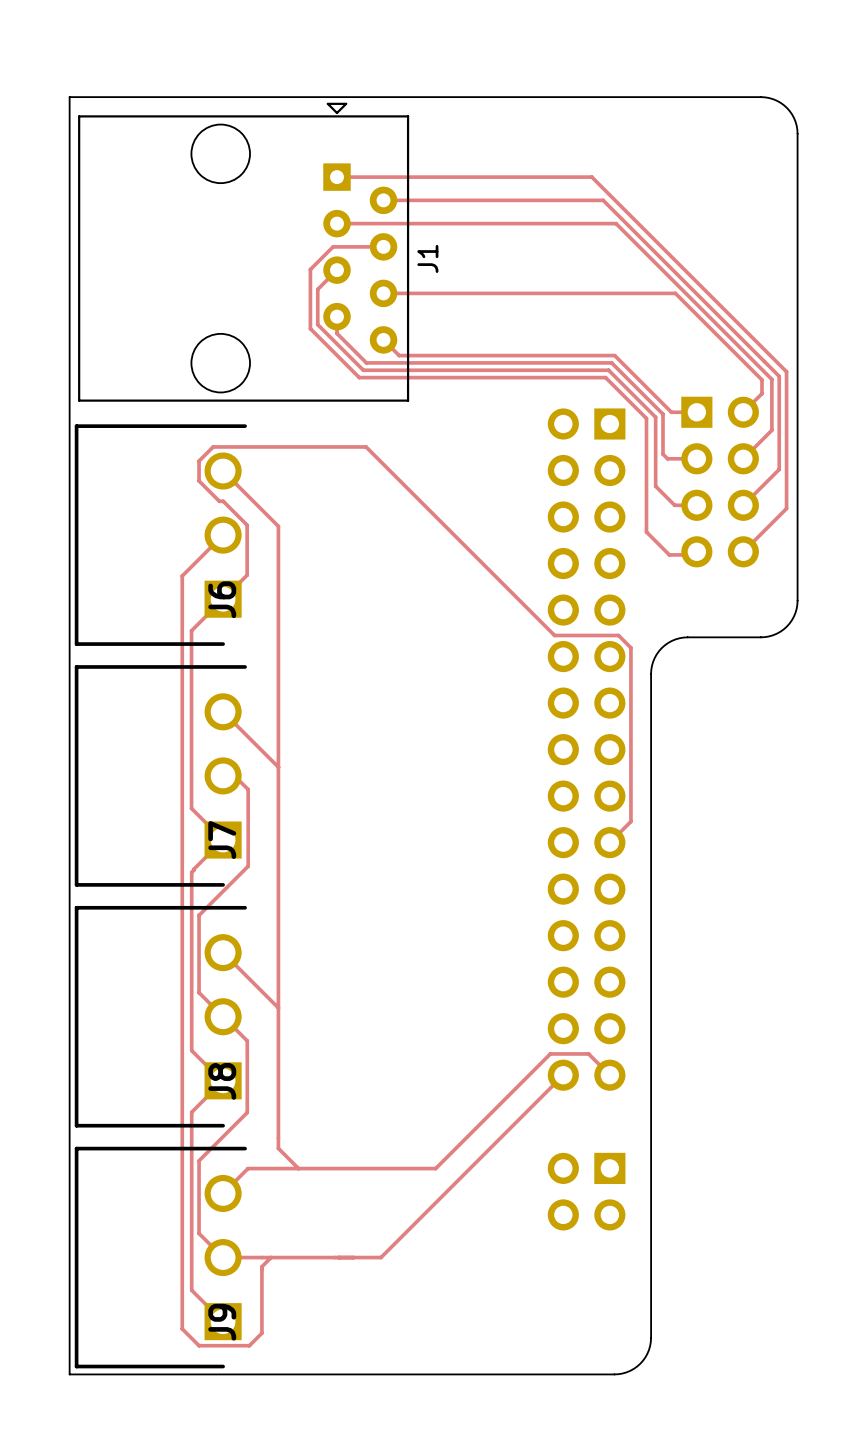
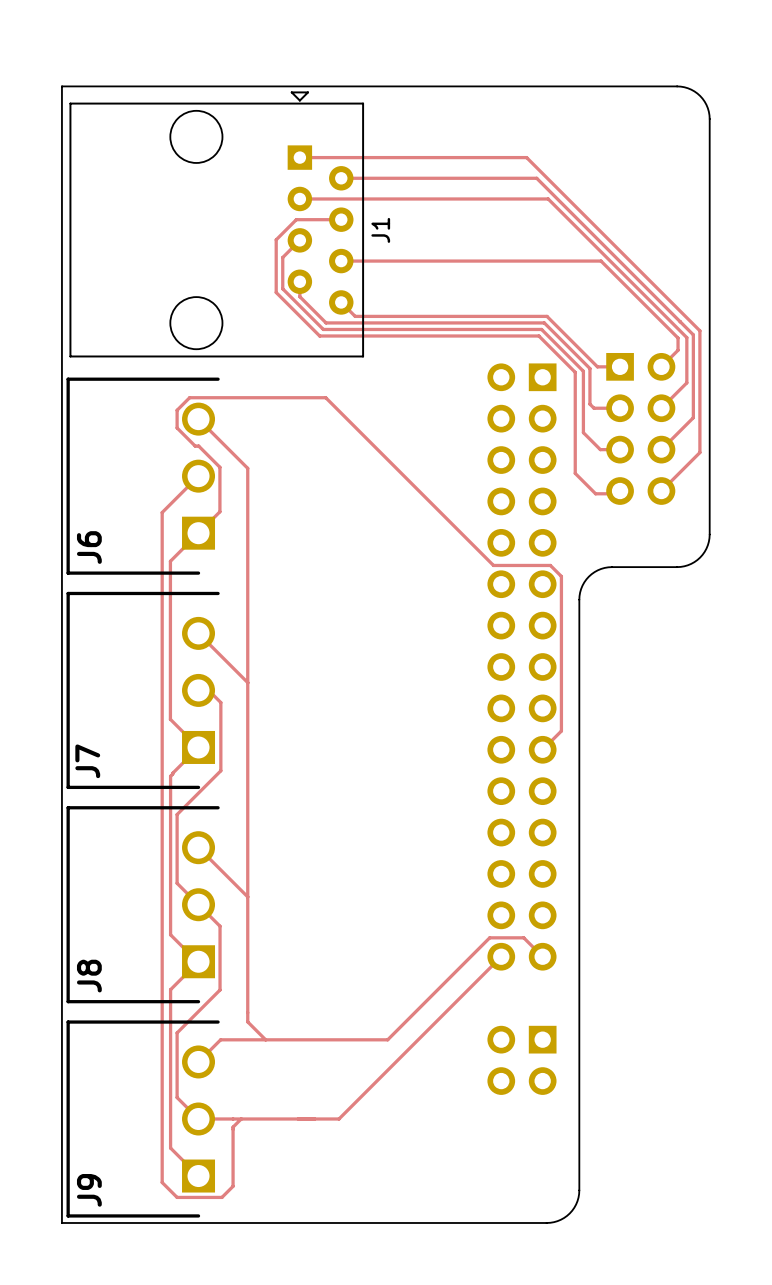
J6 name position: J6 (222, 599) -> J6 (89, 547)
J7 name position: J7 (222, 840) -> J7 (87, 761)
J8 name position: J8 (222, 1081) -> J8 (89, 976)
J9 name position: J9 (222, 1322) -> J9 (89, 1190)

